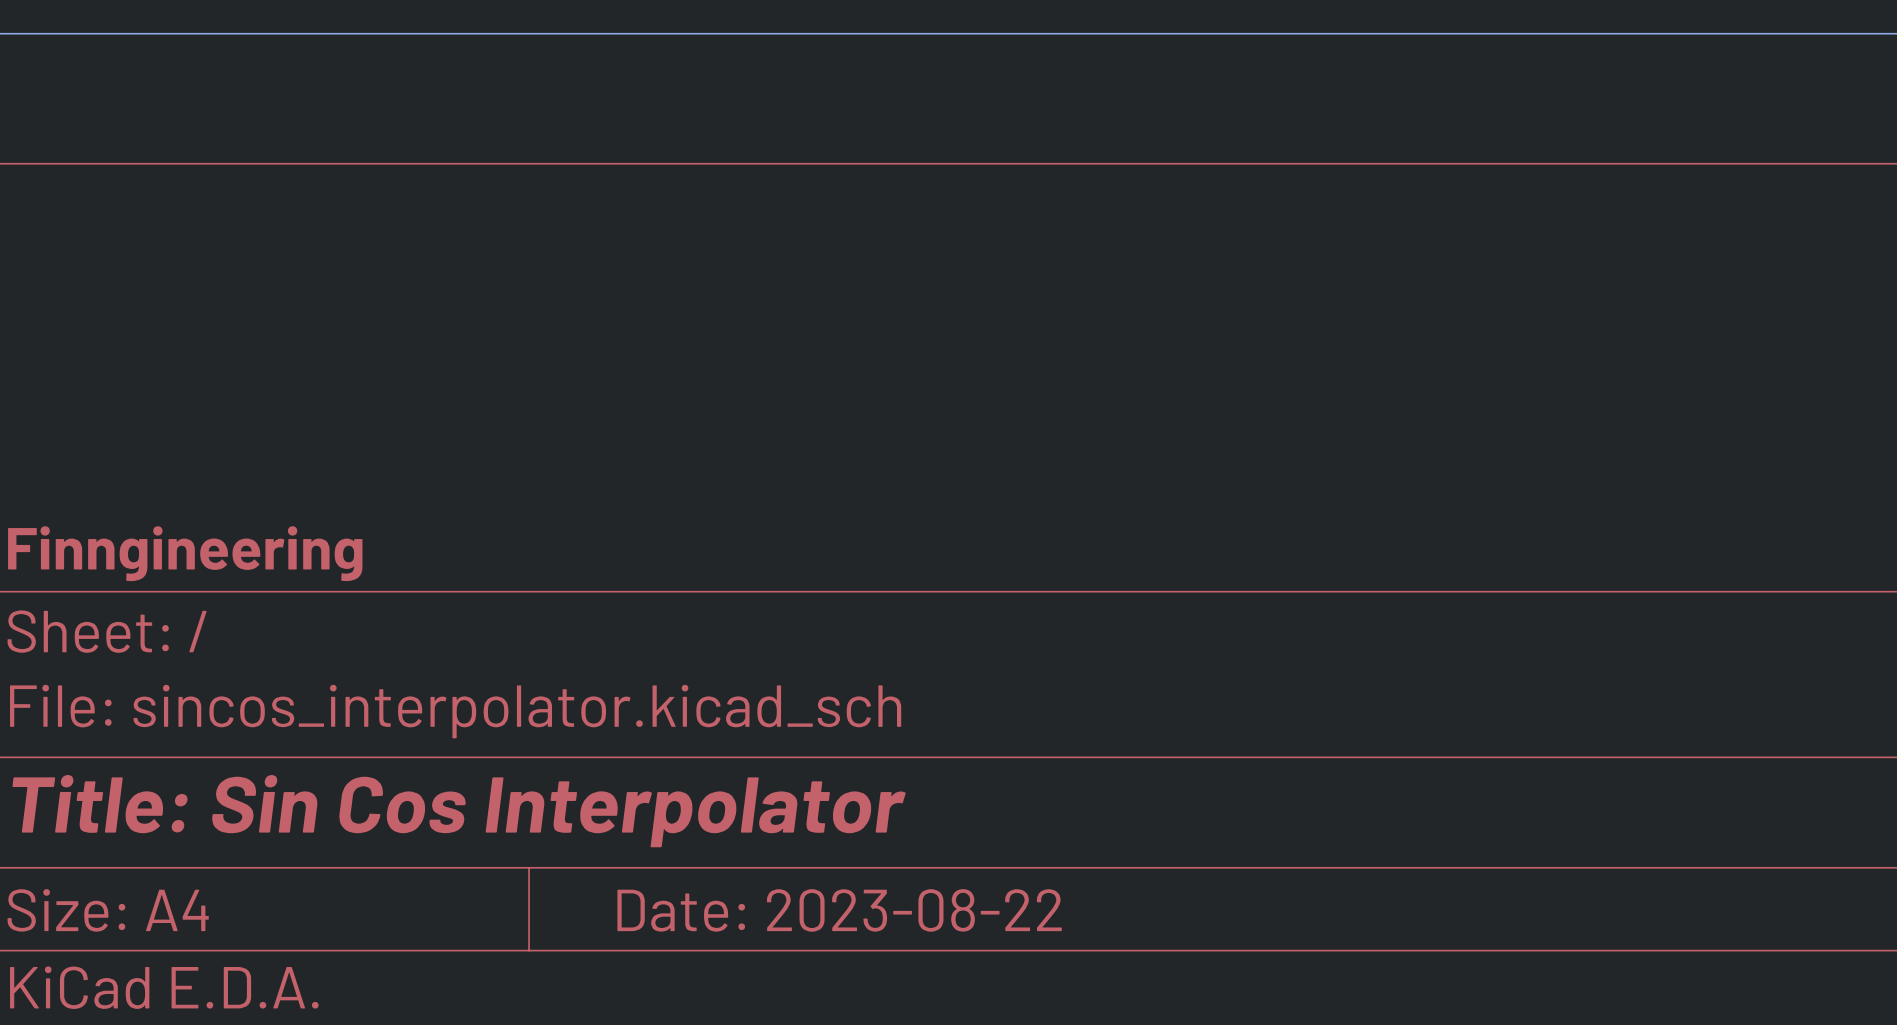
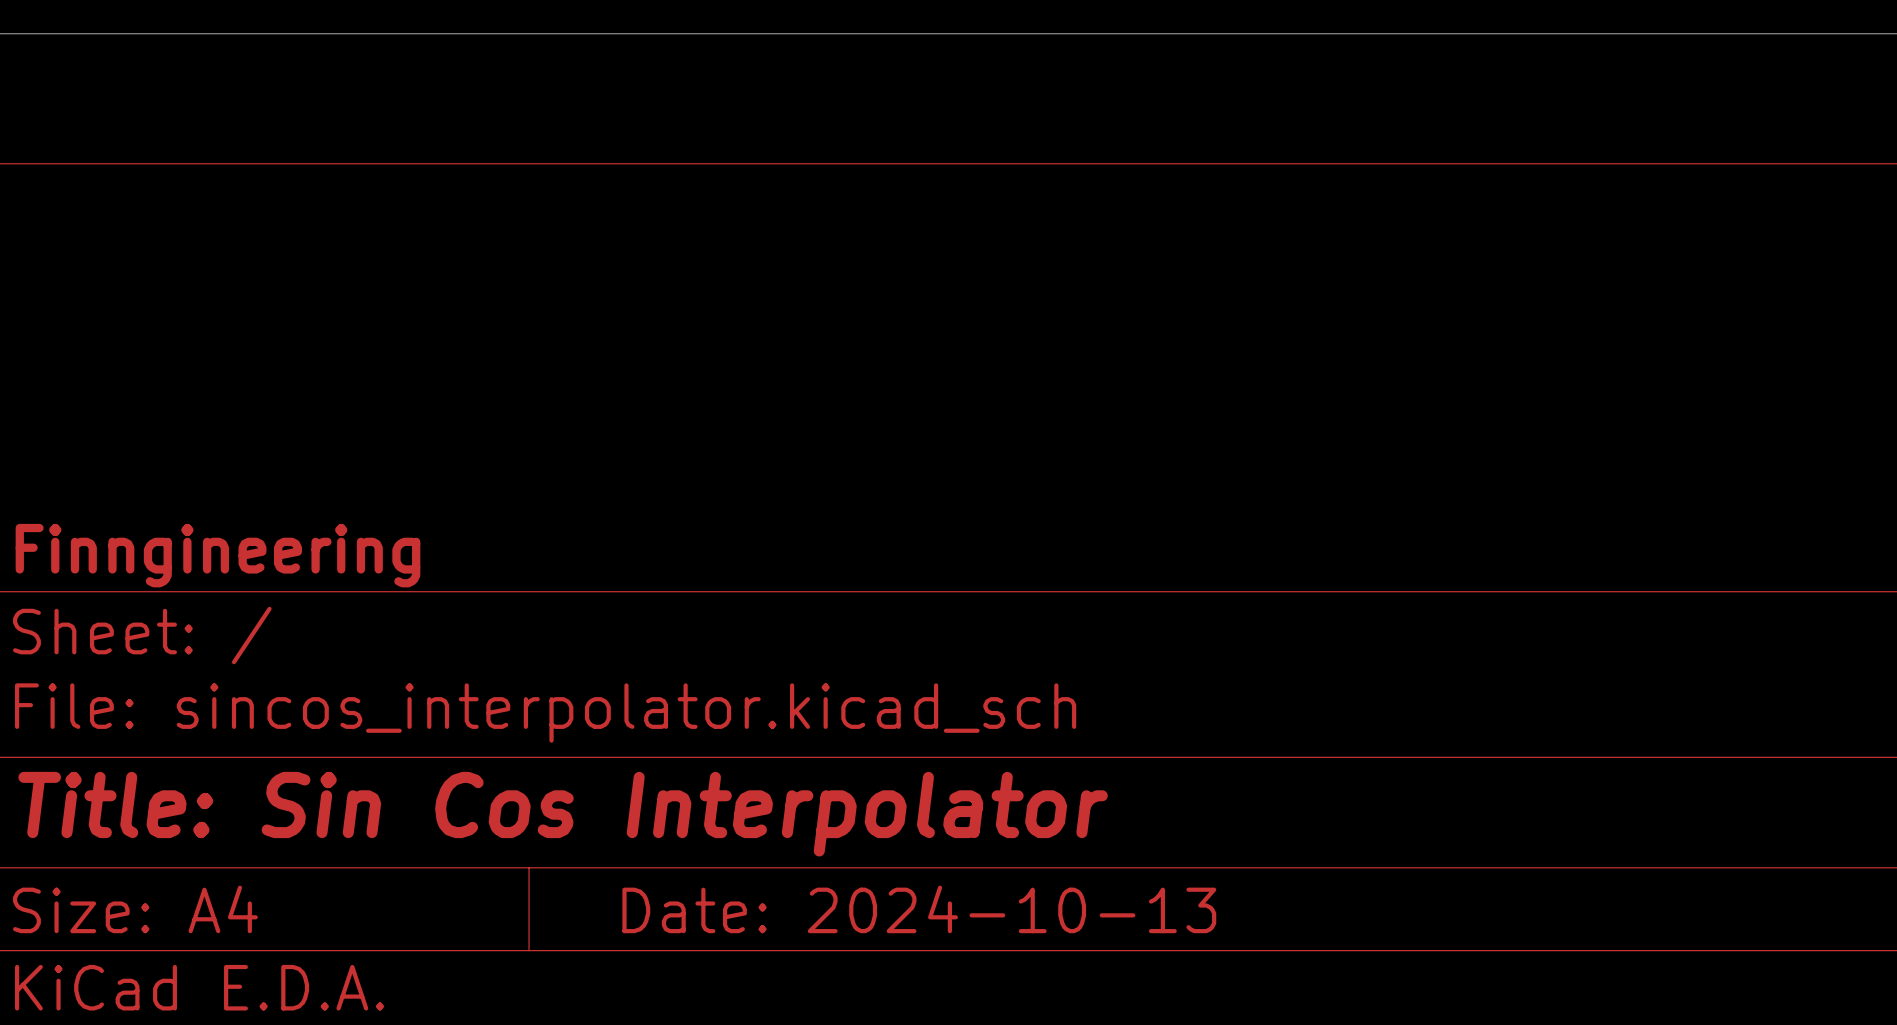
title block: Date: 2023-08-22 (839, 910) -> Date: 2024-10-13 (919, 909)

